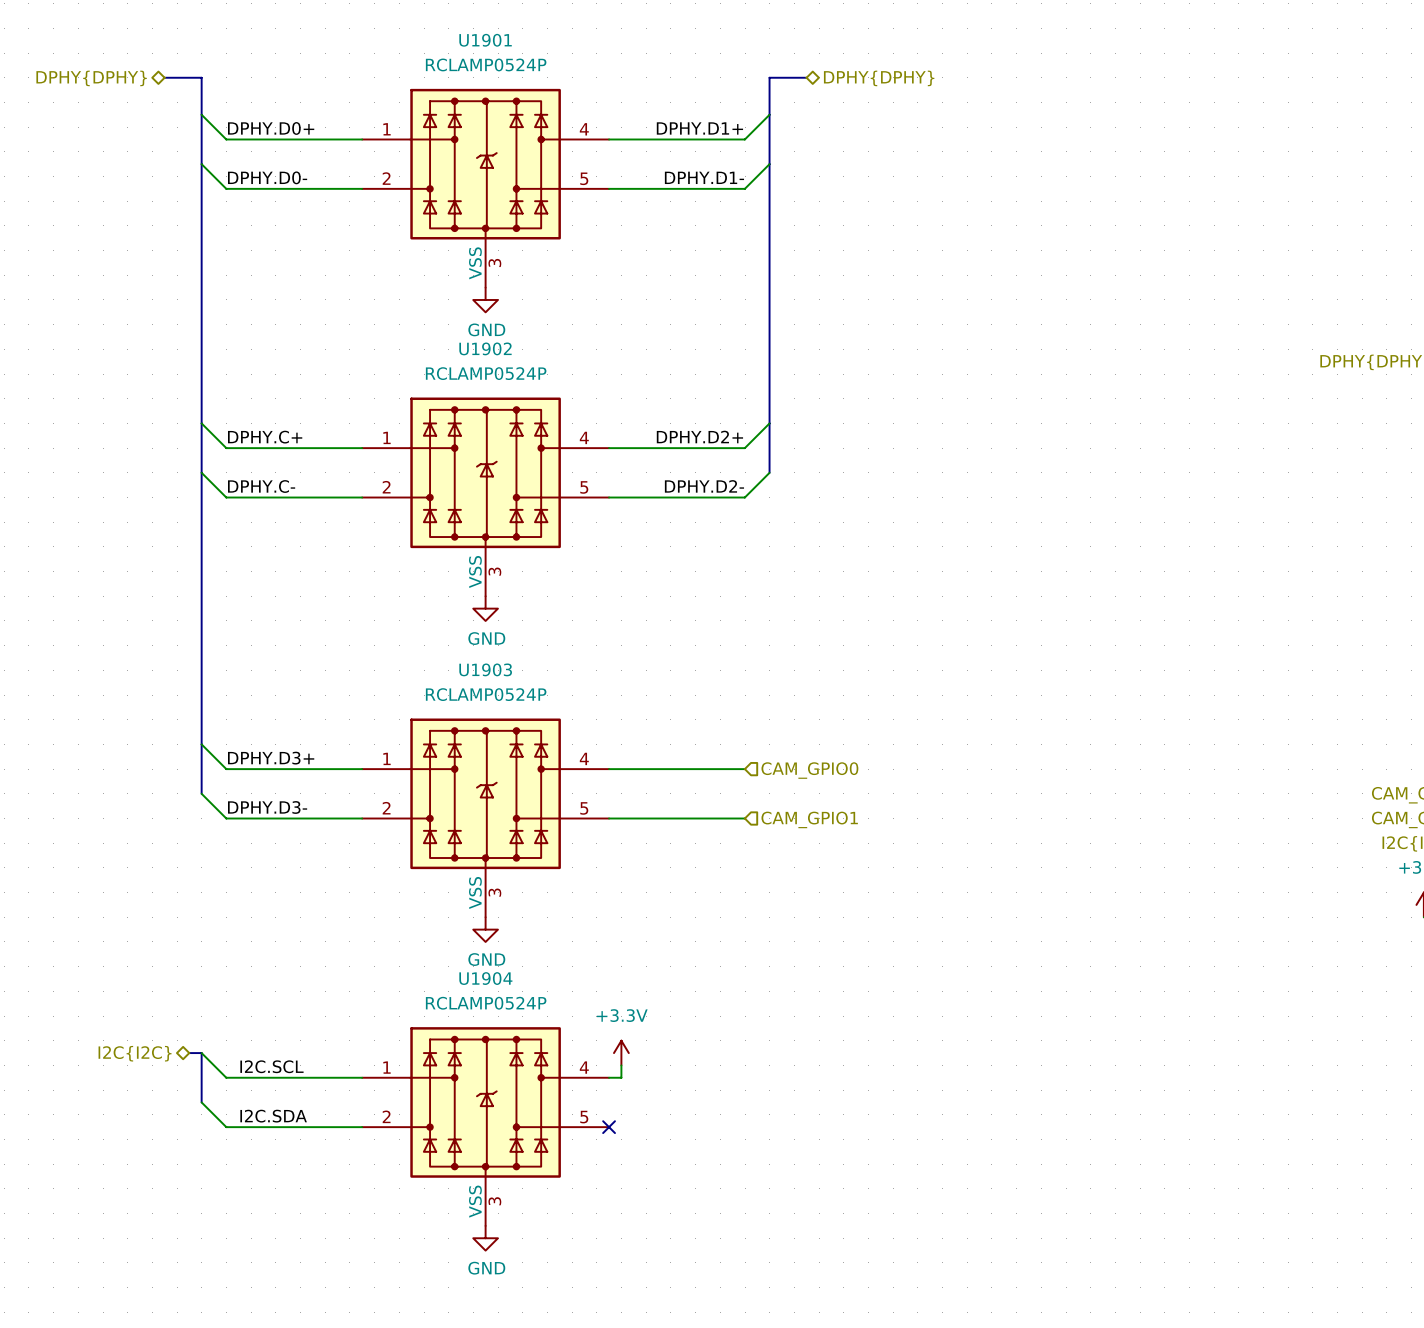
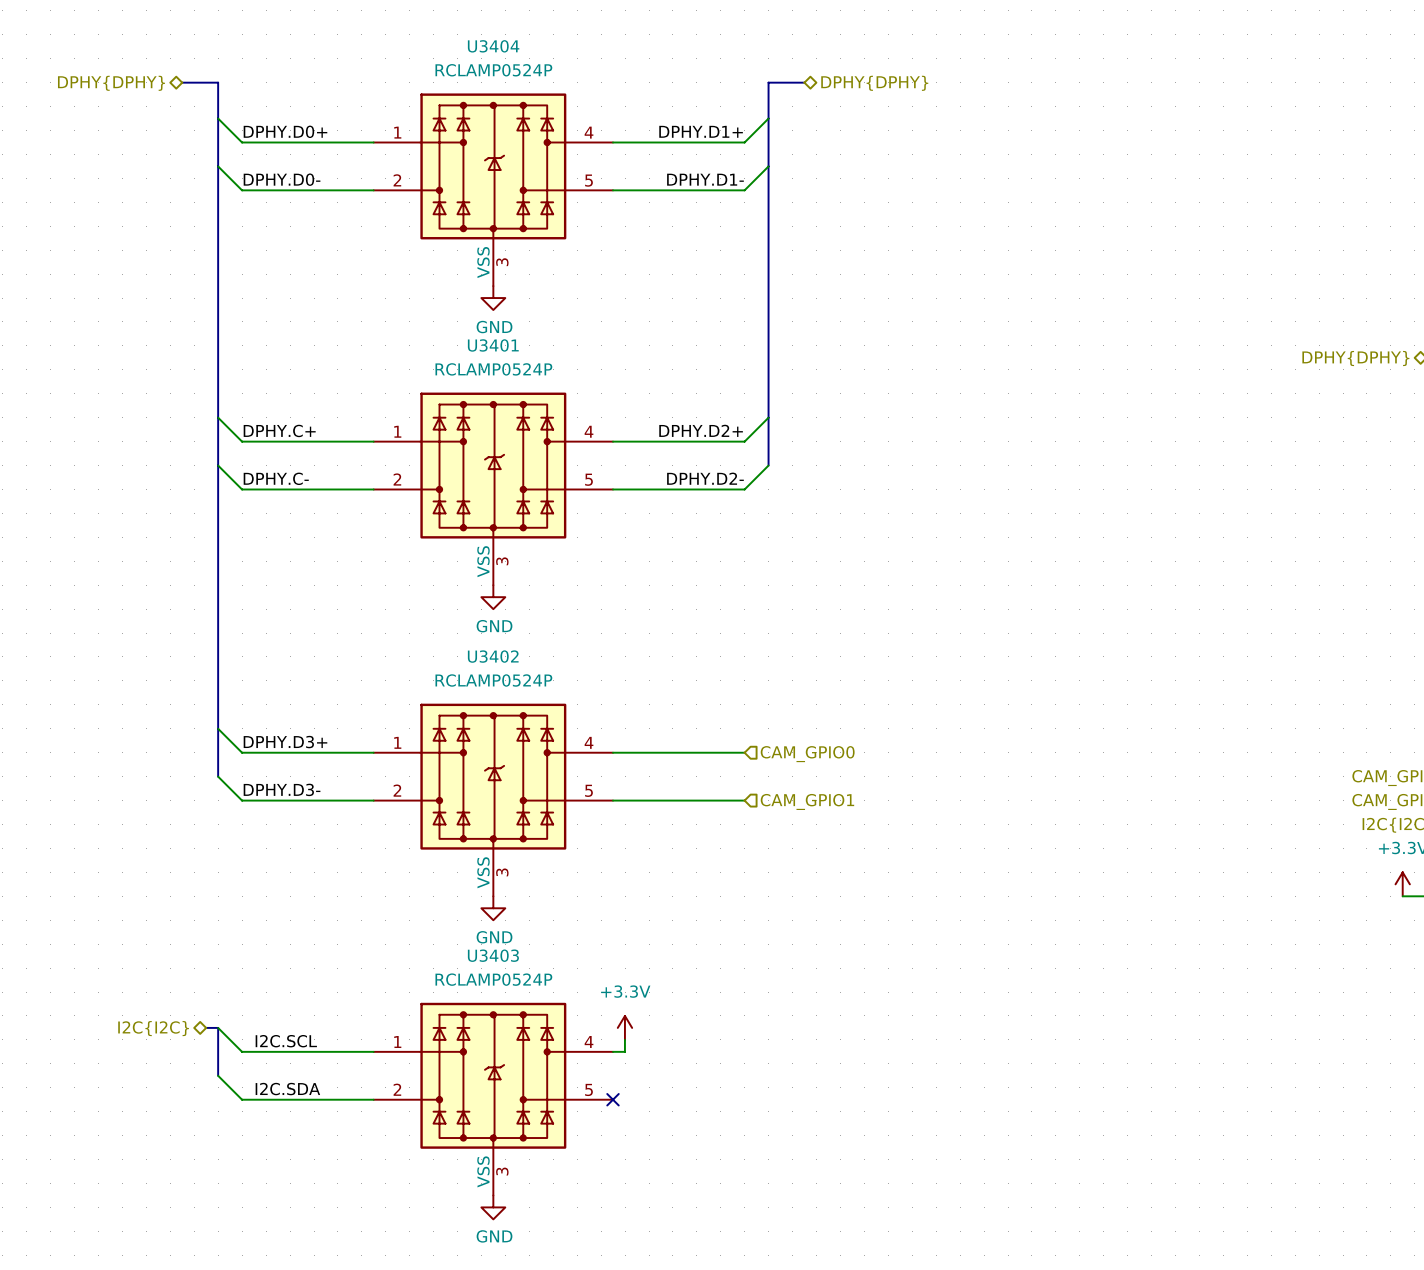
U1901 name: U1901 (485, 40) -> U3404 (493, 46)
U1902 name: U1902 (485, 348) -> U3401 (493, 345)
U1903 name: U1903 (485, 669) -> U3402 (493, 656)
U1904 name: U1904 (485, 978) -> U3403 (493, 955)

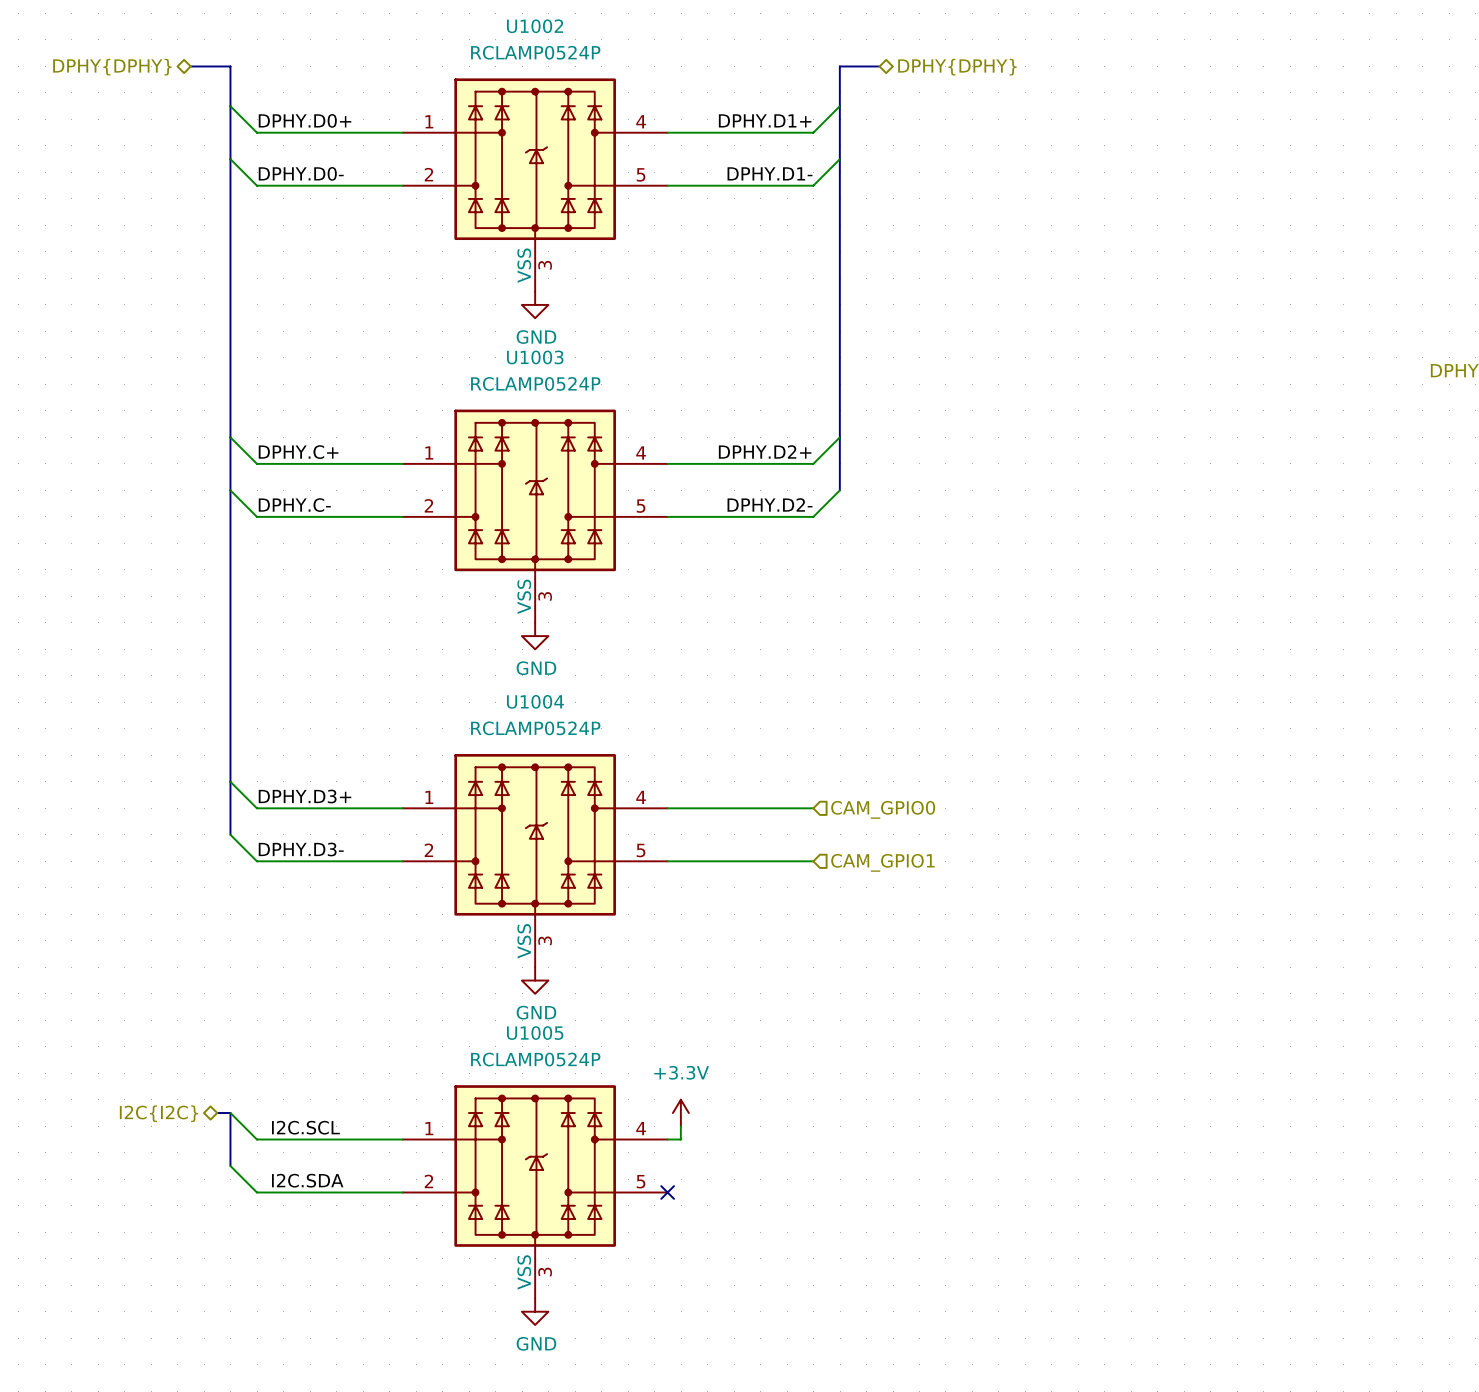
U3404 name: U3404 (493, 46) -> U1002 (535, 26)
U3401 name: U3401 (493, 345) -> U1003 (535, 357)
U3402 name: U3402 (493, 656) -> U1004 (535, 701)
U3403 name: U3403 (493, 955) -> U1005 (535, 1033)

